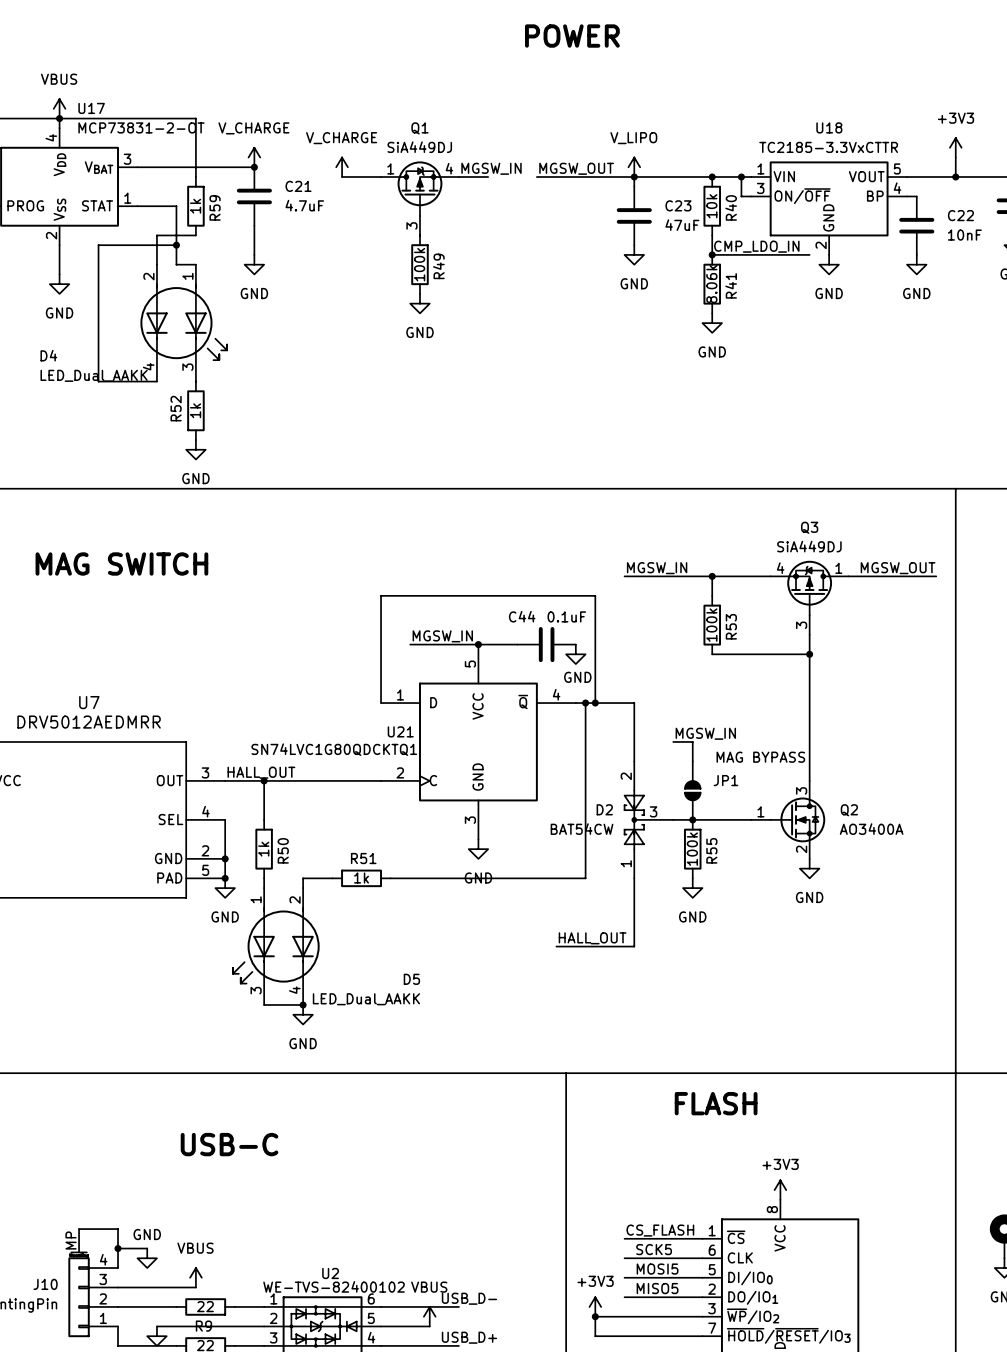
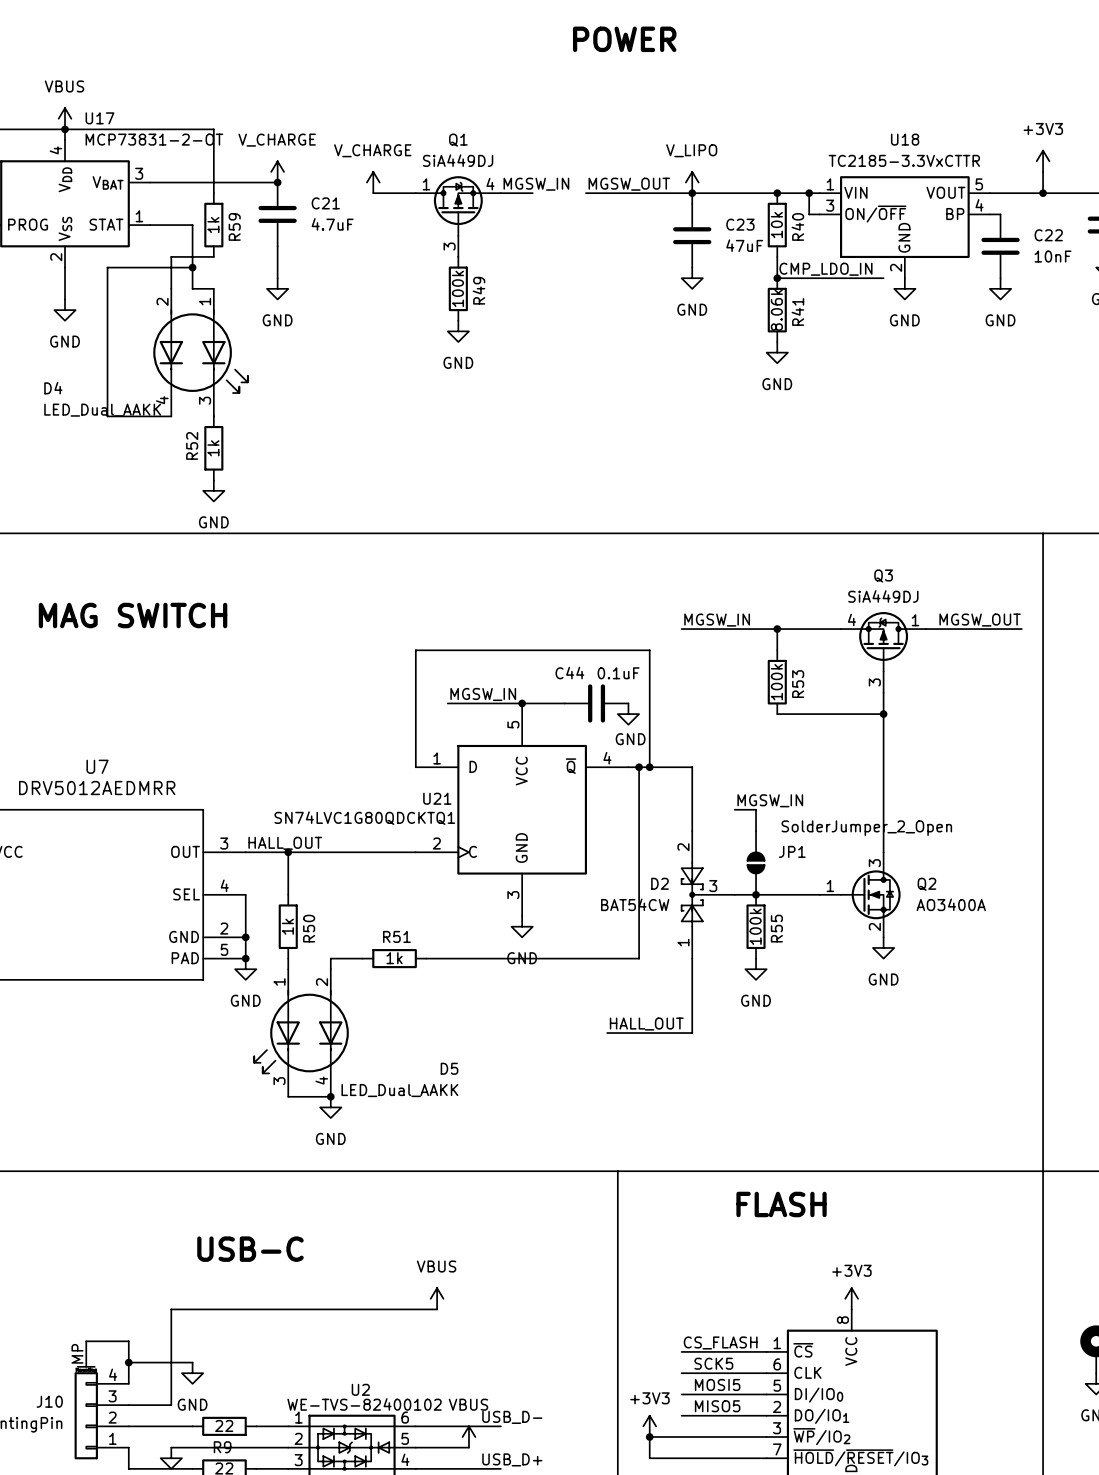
JP1 value: MAG BYPASS (760, 757) -> SolderJumper_2_Open (866, 828)
power symbol: none -> VBUS (437, 1298)
power symbol text position: GND (147, 1234) -> GND (192, 1404)
wire: none -> (160, 1362) (192, 1362)
power symbol position: GND (147, 1258) -> GND (192, 1373)
power symbol: VBUS (195, 1277) -> none
wire: (156, 1287) (195, 1287) -> (171, 1405) (171, 1309) (437, 1309)

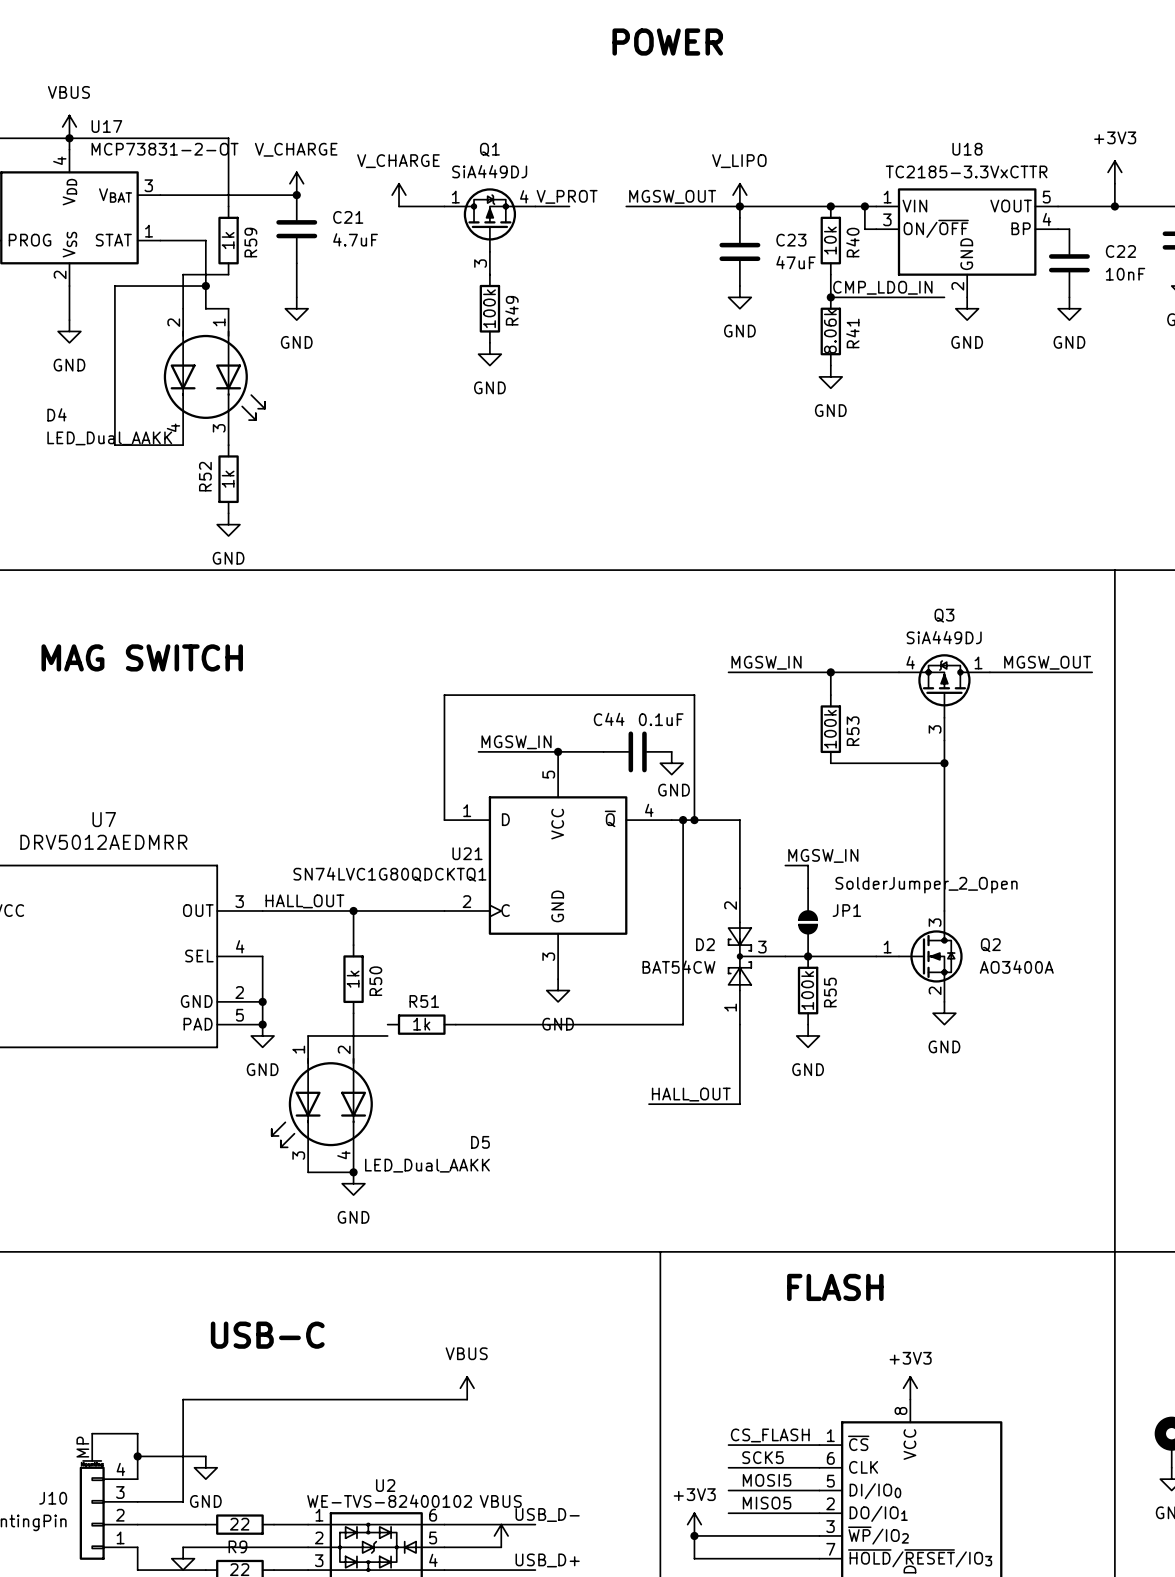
label: MGSW_IN (536, 184) -> V_PROT (567, 196)
wire: (288, 852) (288, 894) -> none
junction position: (288, 852) -> (353, 910)
wire: none -> (353, 910) (353, 945)
R50 position: (288, 926) -> (353, 979)
wire: (288, 958) (288, 969) -> (387, 1035) (308, 1035)
wire: (330, 958) (362, 958) -> (353, 1024) (353, 1013)

